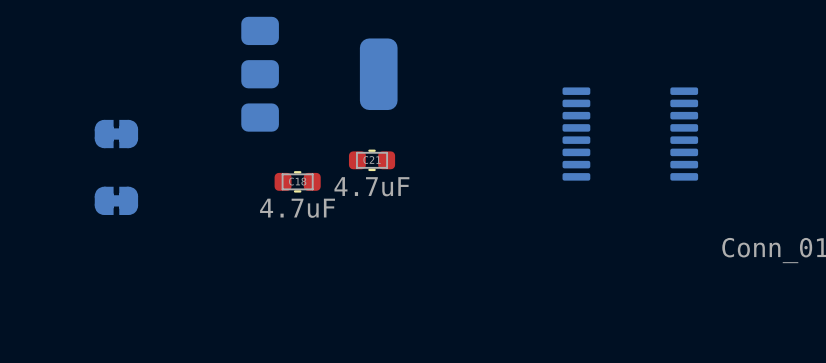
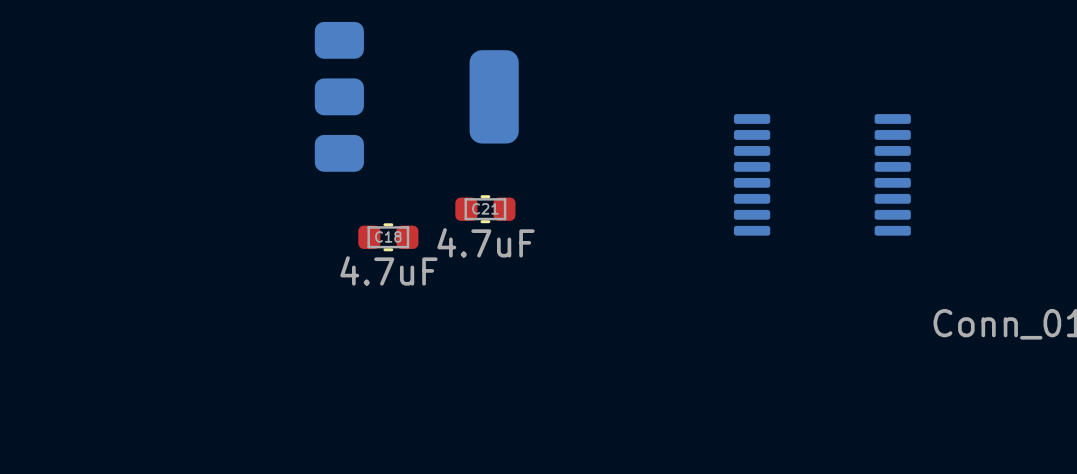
part: (116, 134) -> none
part: (116, 200) -> none

